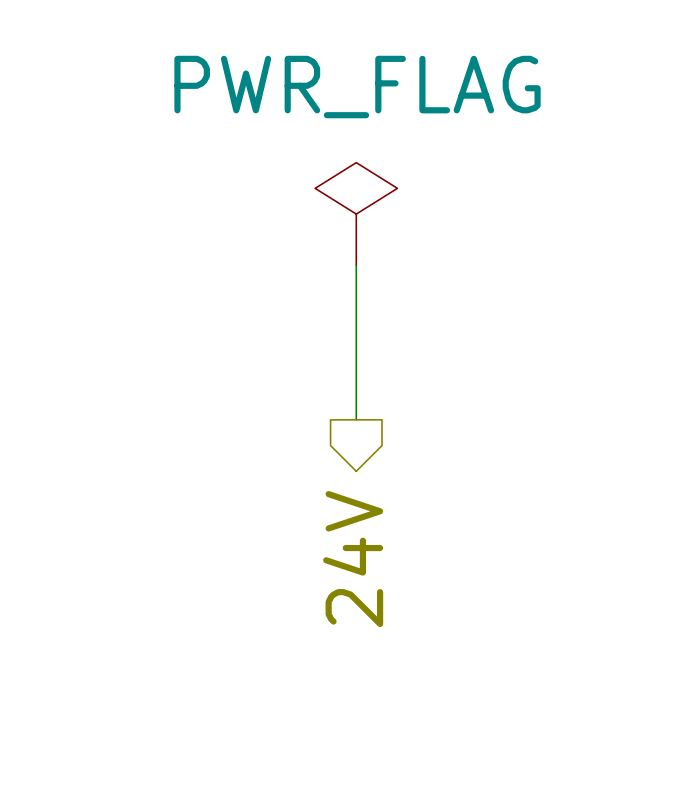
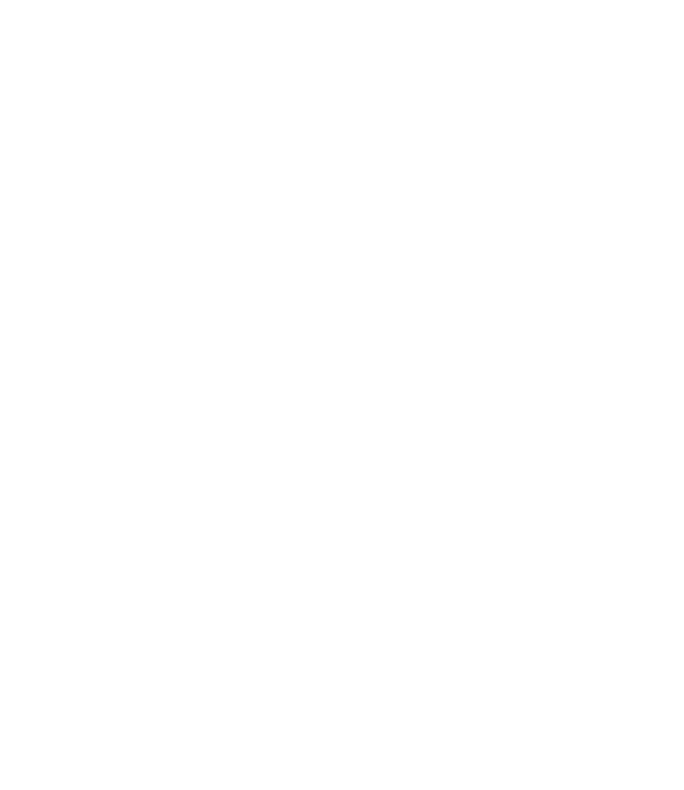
power symbol: PWR_FLAG (356, 214) -> none
wire: (356, 265) (356, 419) -> none
hierarchical label: 24V (353, 559) -> none

